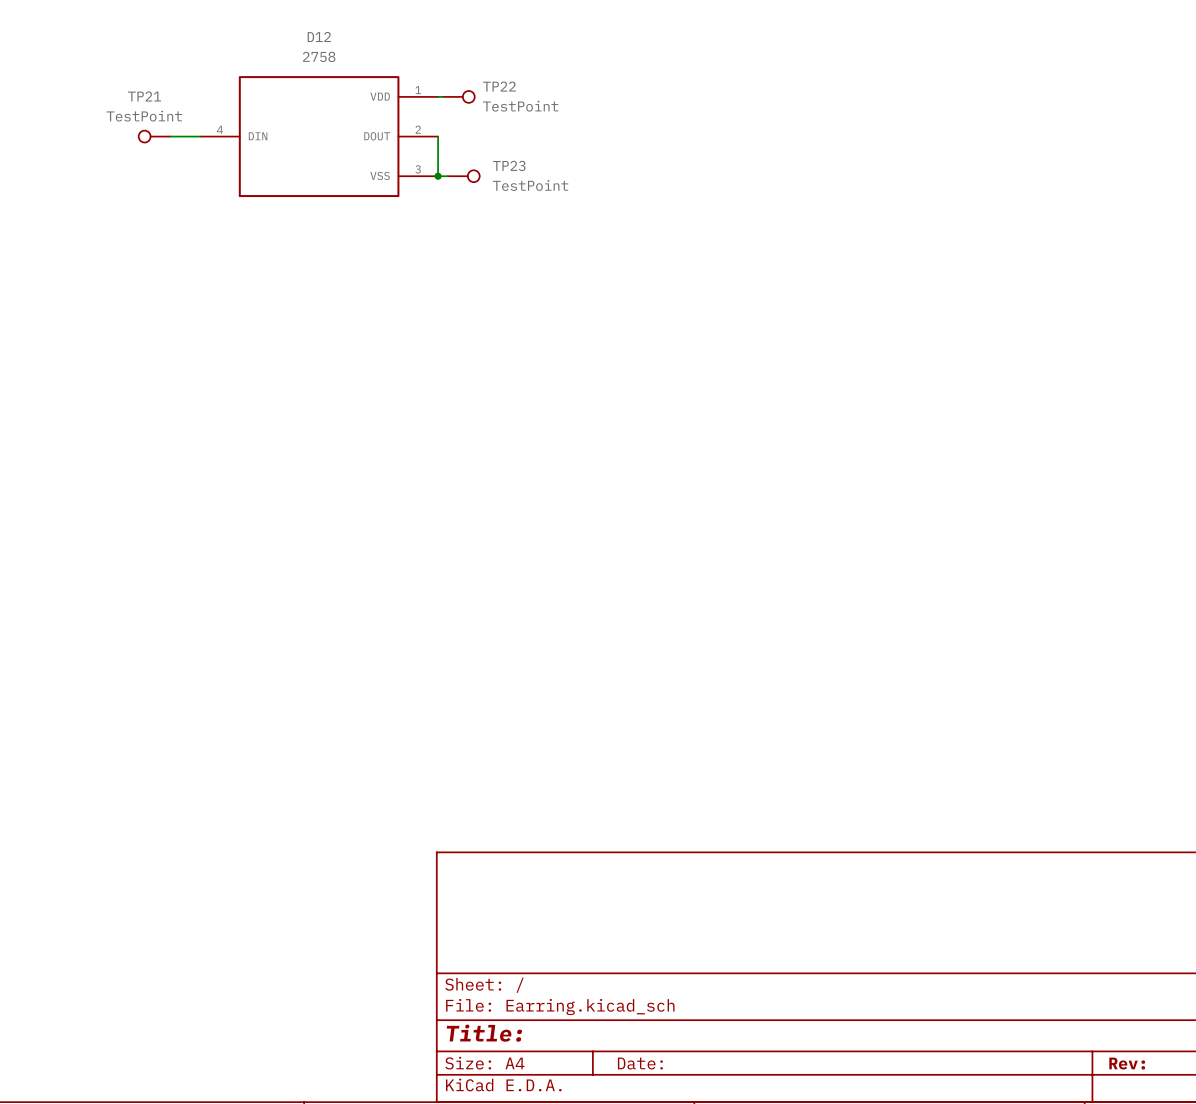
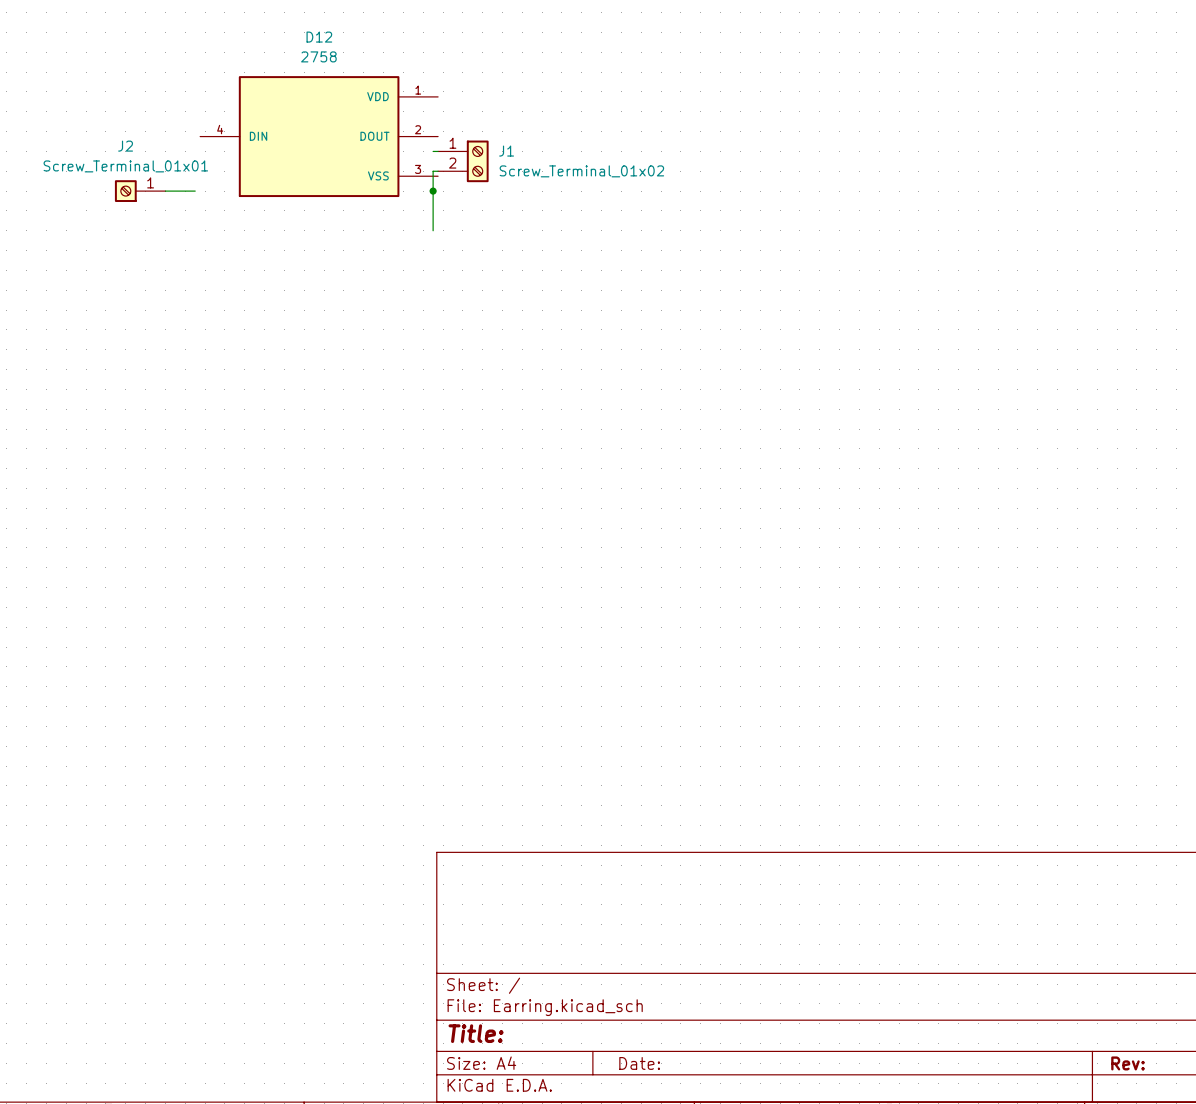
wire: (438, 96) (443, 96) -> (433, 151) (438, 151)
TP22: TestPoint (458, 96) -> none
TP21: TestPoint (154, 136) -> none
wire: (170, 136) (200, 136) -> (165, 191) (195, 191)
wire: (438, 136) (438, 176) (447, 176) -> none
J1: none -> Screw_Terminal_01x02 (463, 161)
wire: none -> (438, 171) (433, 171) (433, 230)
junction position: (438, 176) -> (433, 191)
TP23: TestPoint (463, 176) -> none
J2: none -> Screw_Terminal_01x01 (140, 191)

